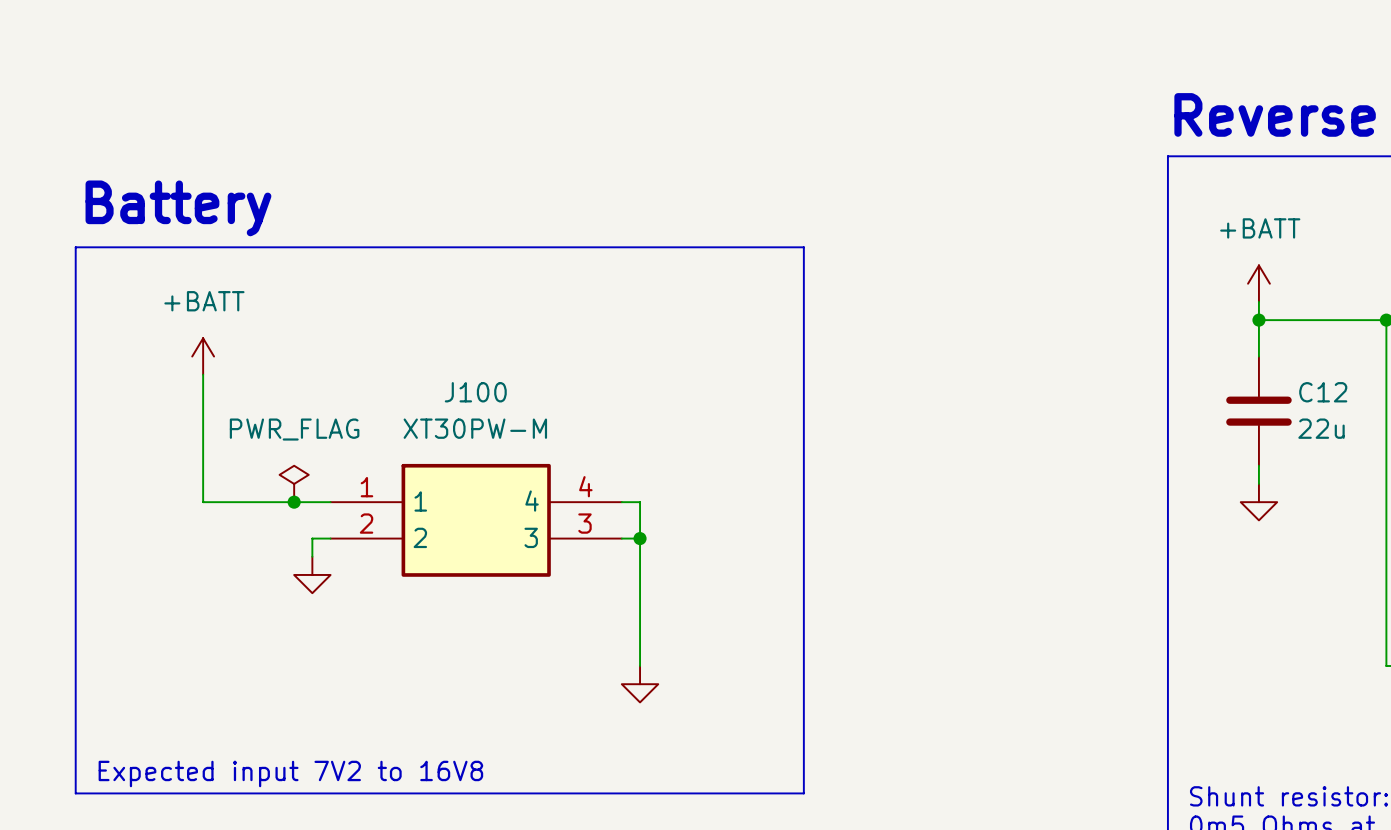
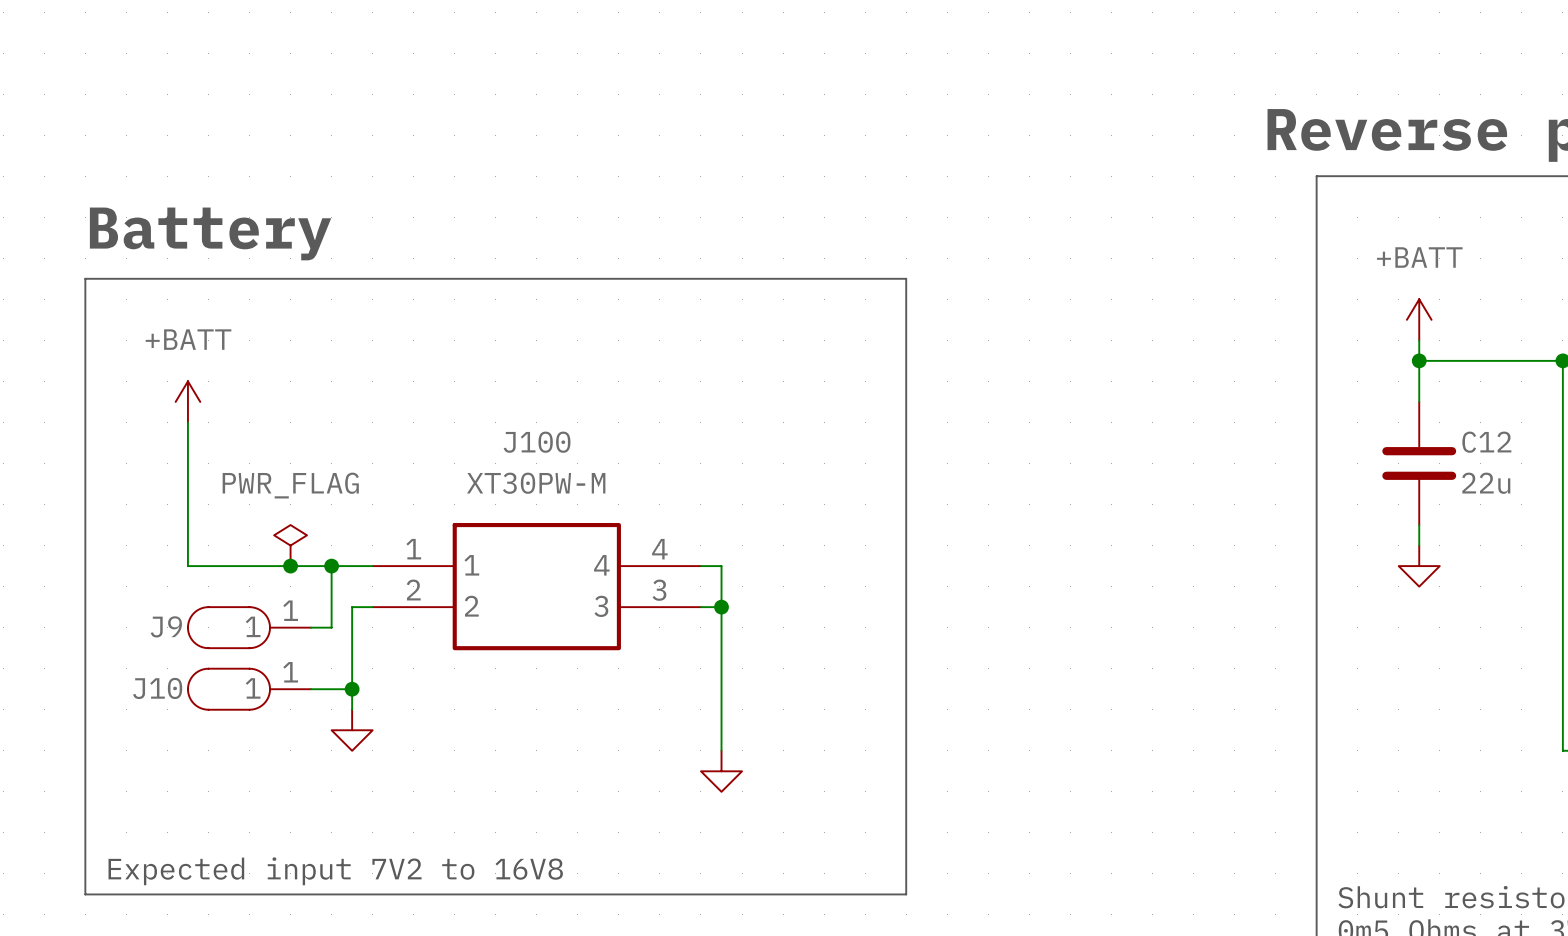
power symbol position: +BATT (203, 356) -> +BATT (187, 401)
wire: (203, 374) (203, 502) -> (187, 422) (187, 566) (229, 566)
power symbol position: PWR_FLAG (294, 483) -> PWR_FLAG (290, 545)
junction: none -> (290, 566)
wire: none -> (331, 566) (331, 627) (311, 627)
J9: none -> (249, 627)
wire: none -> (352, 627) (352, 709)
power symbol position: (312, 574) -> (352, 730)
J10: none -> (249, 689)
wire: none -> (311, 689) (352, 689)
junction: none -> (352, 689)

